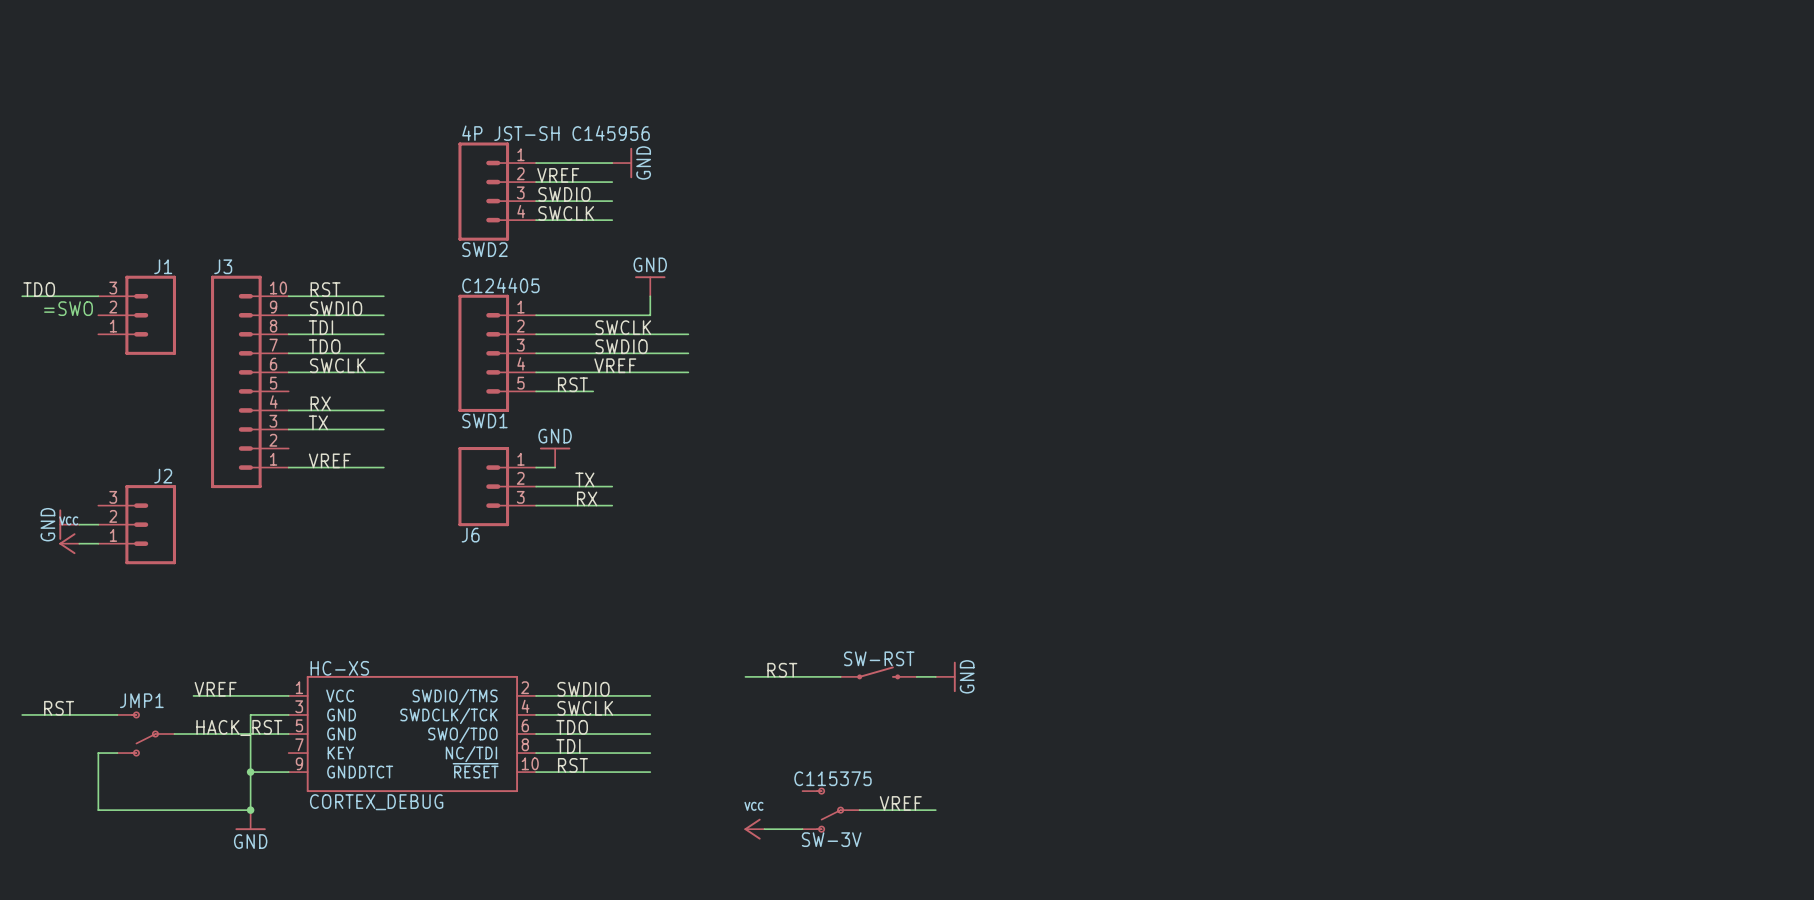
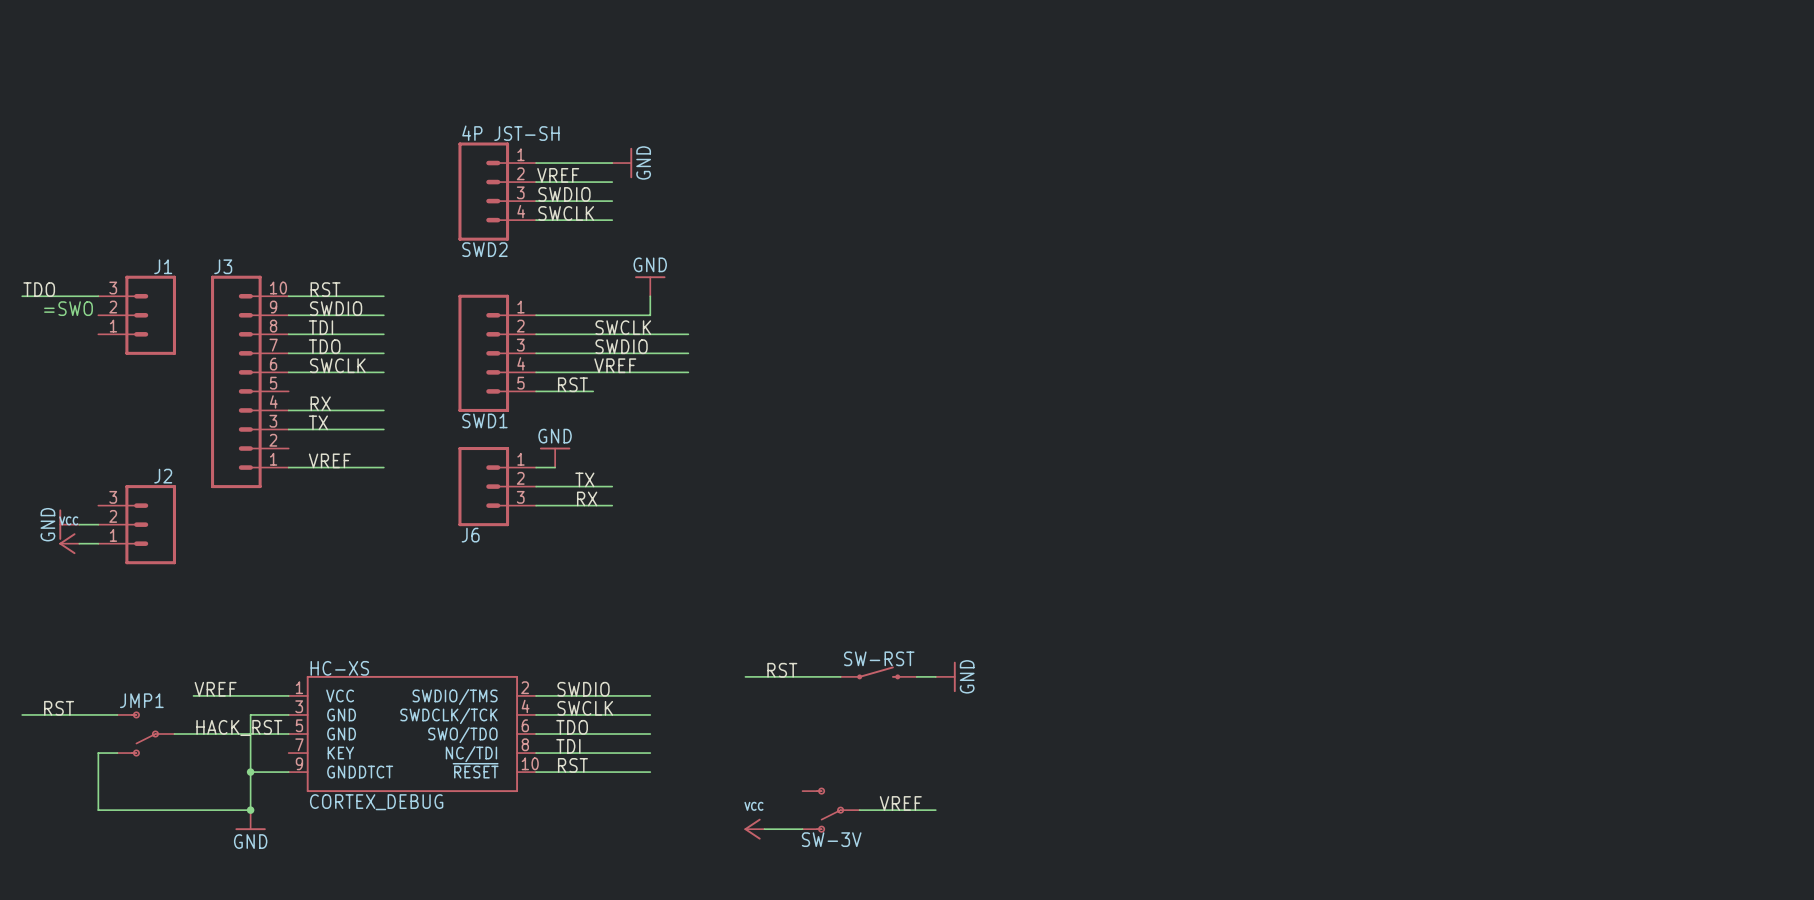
SWD2 value: 4P JST-SH C145956 (556, 133) -> 4P JST-SH (510, 133)
SWD1 value: C124405 (500, 285) -> none
SW-3V value: C115375 (833, 778) -> none

